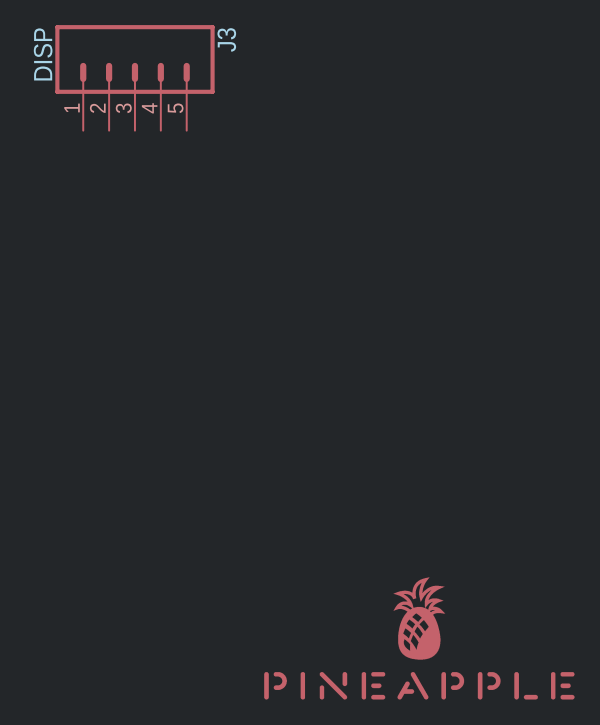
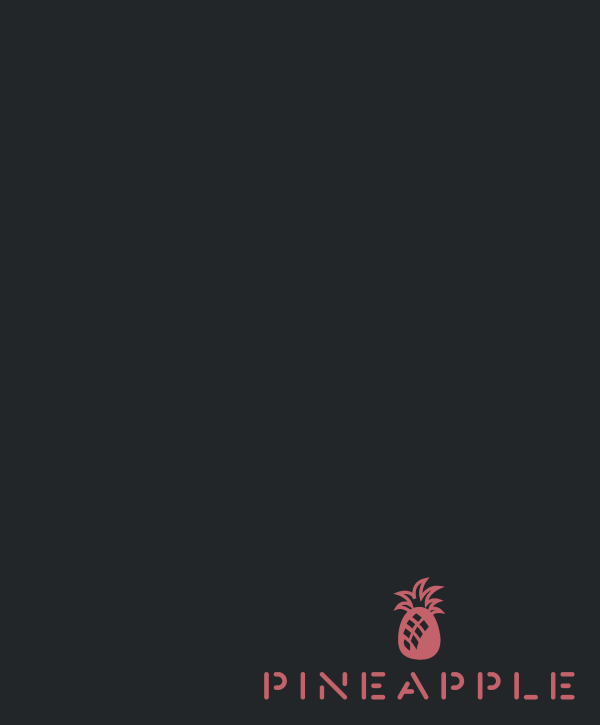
J3: DISP (134, 77) -> none

